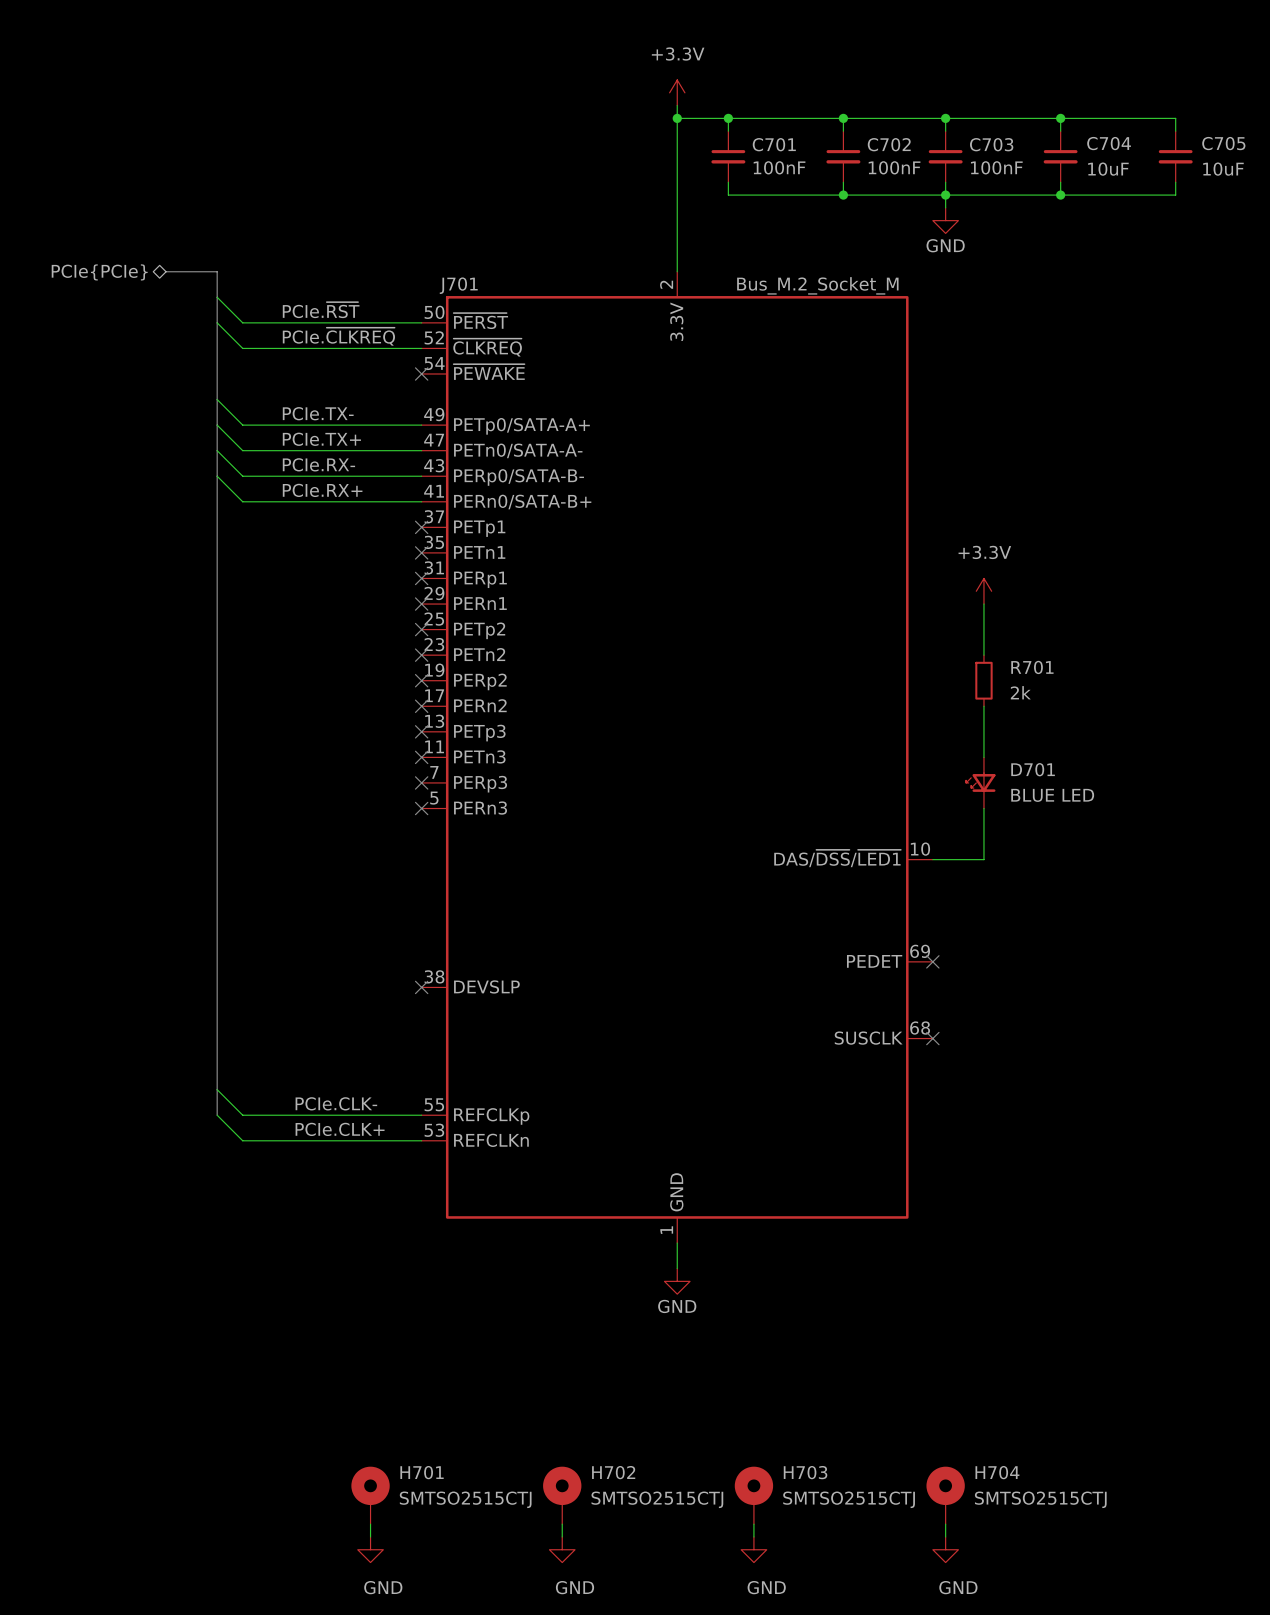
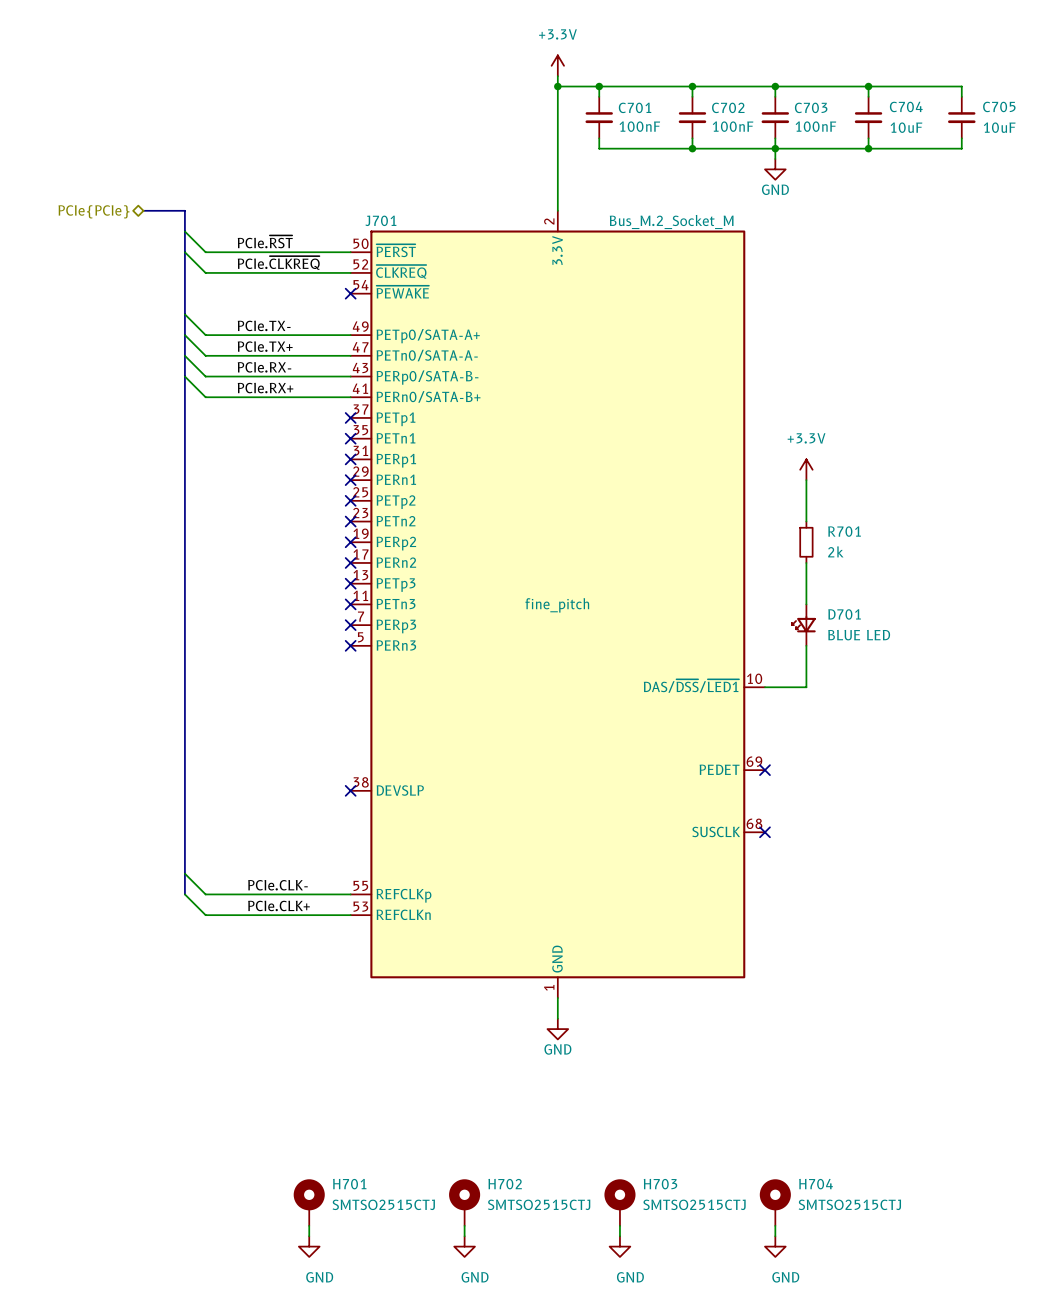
J701 text: none -> fine_pitch (557, 605)

